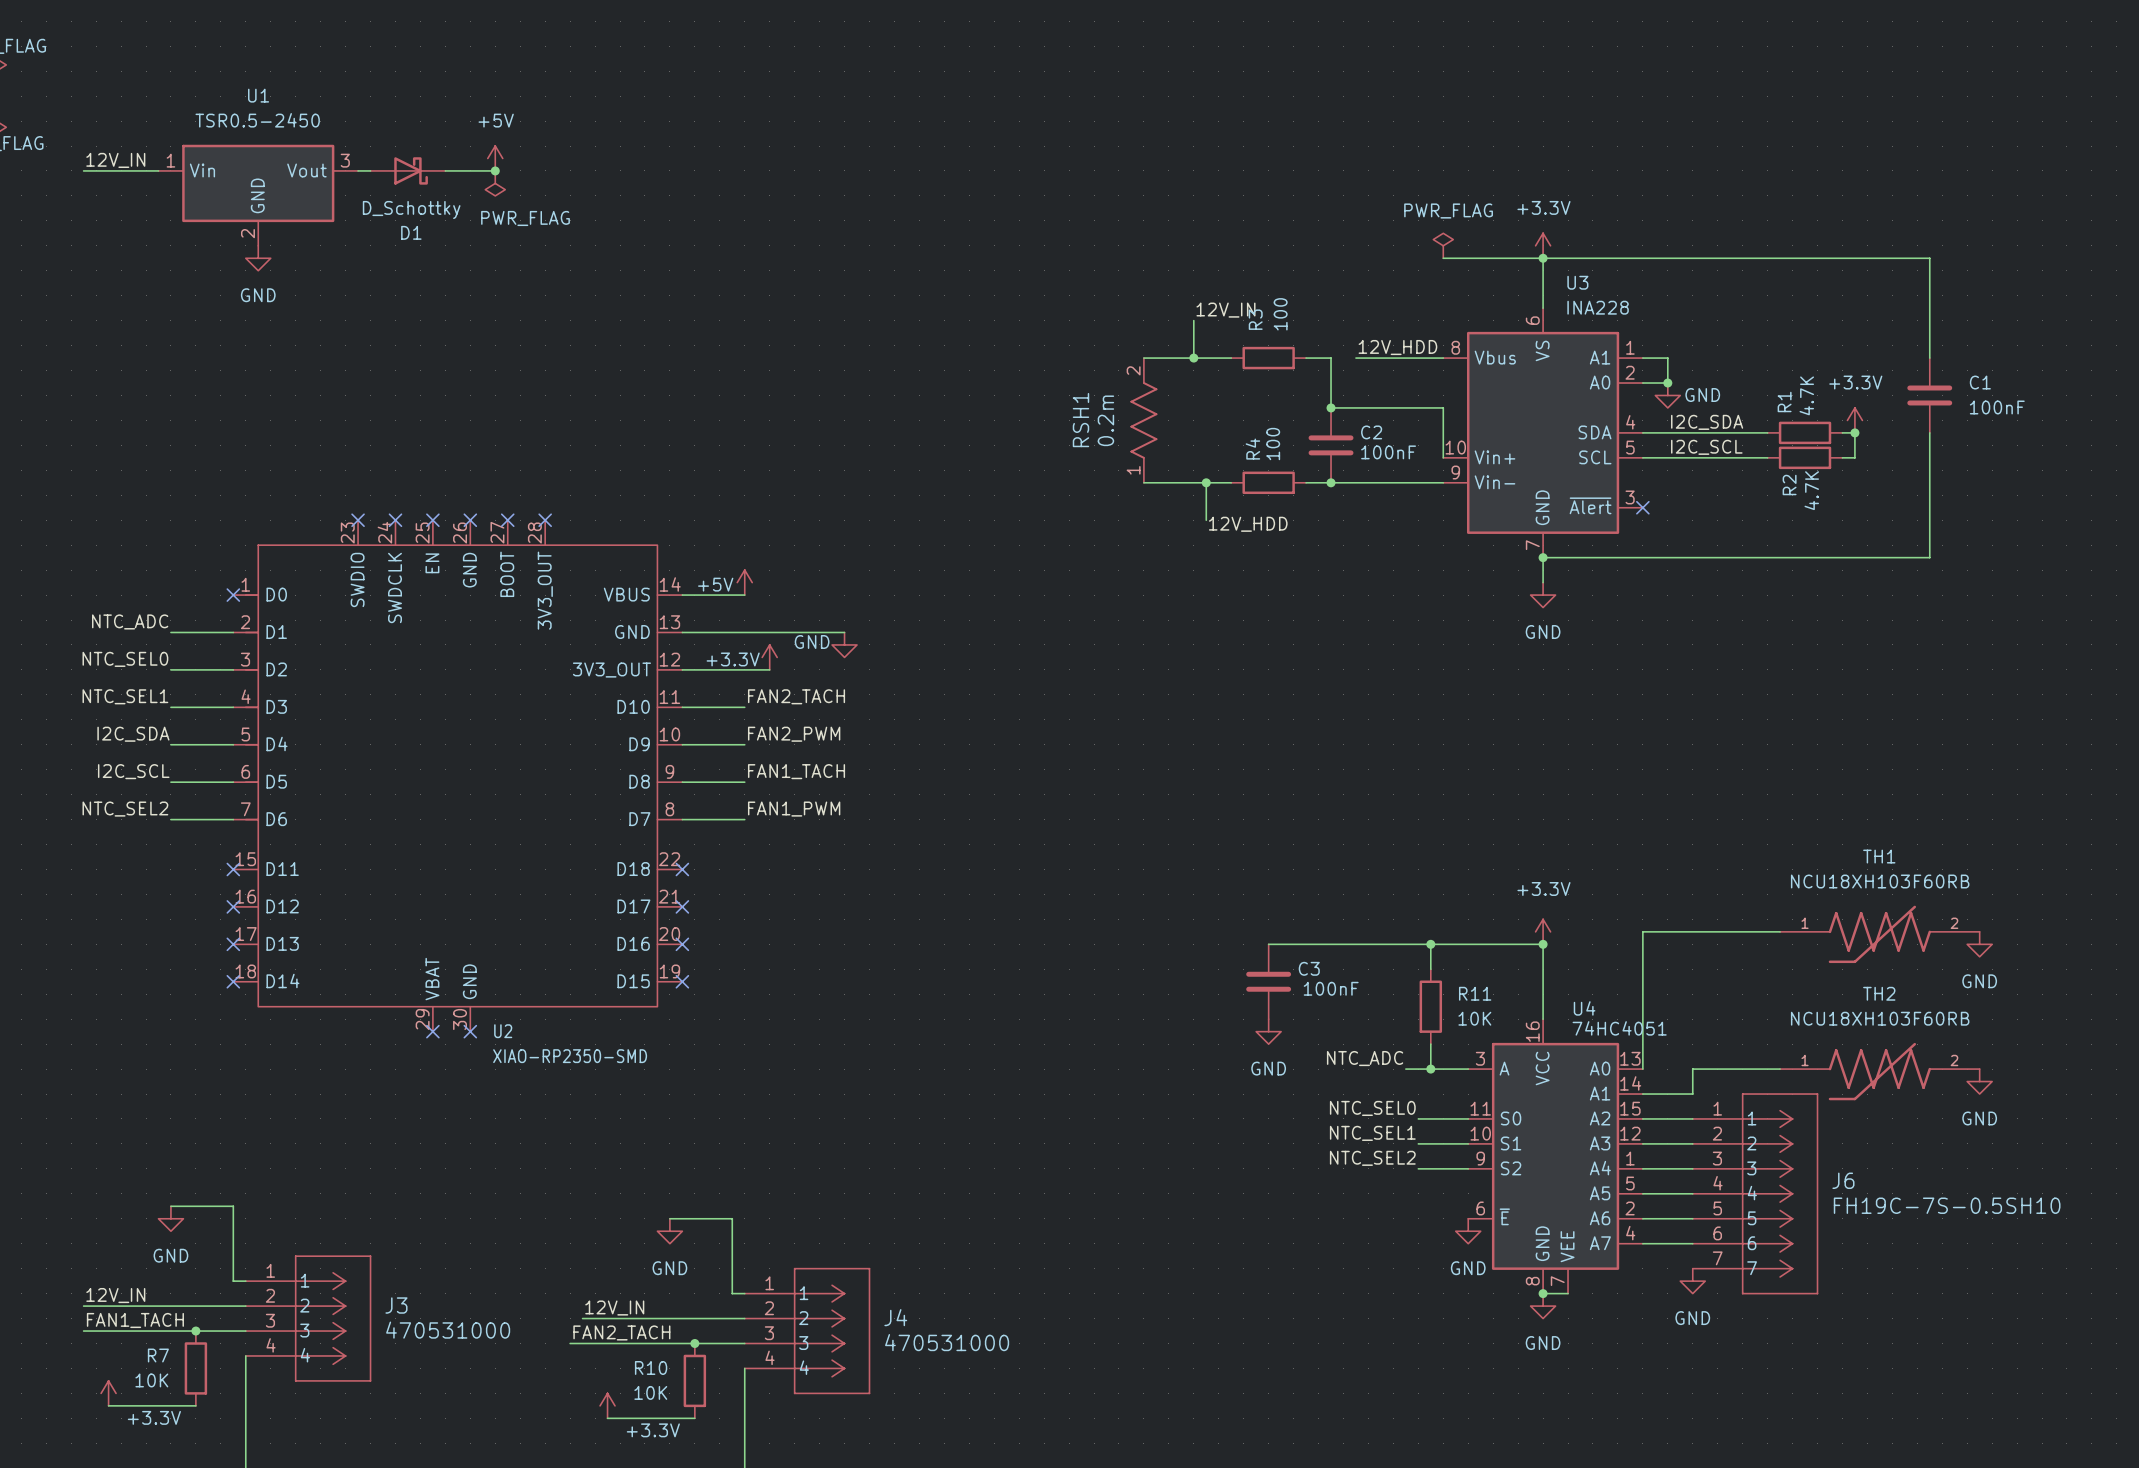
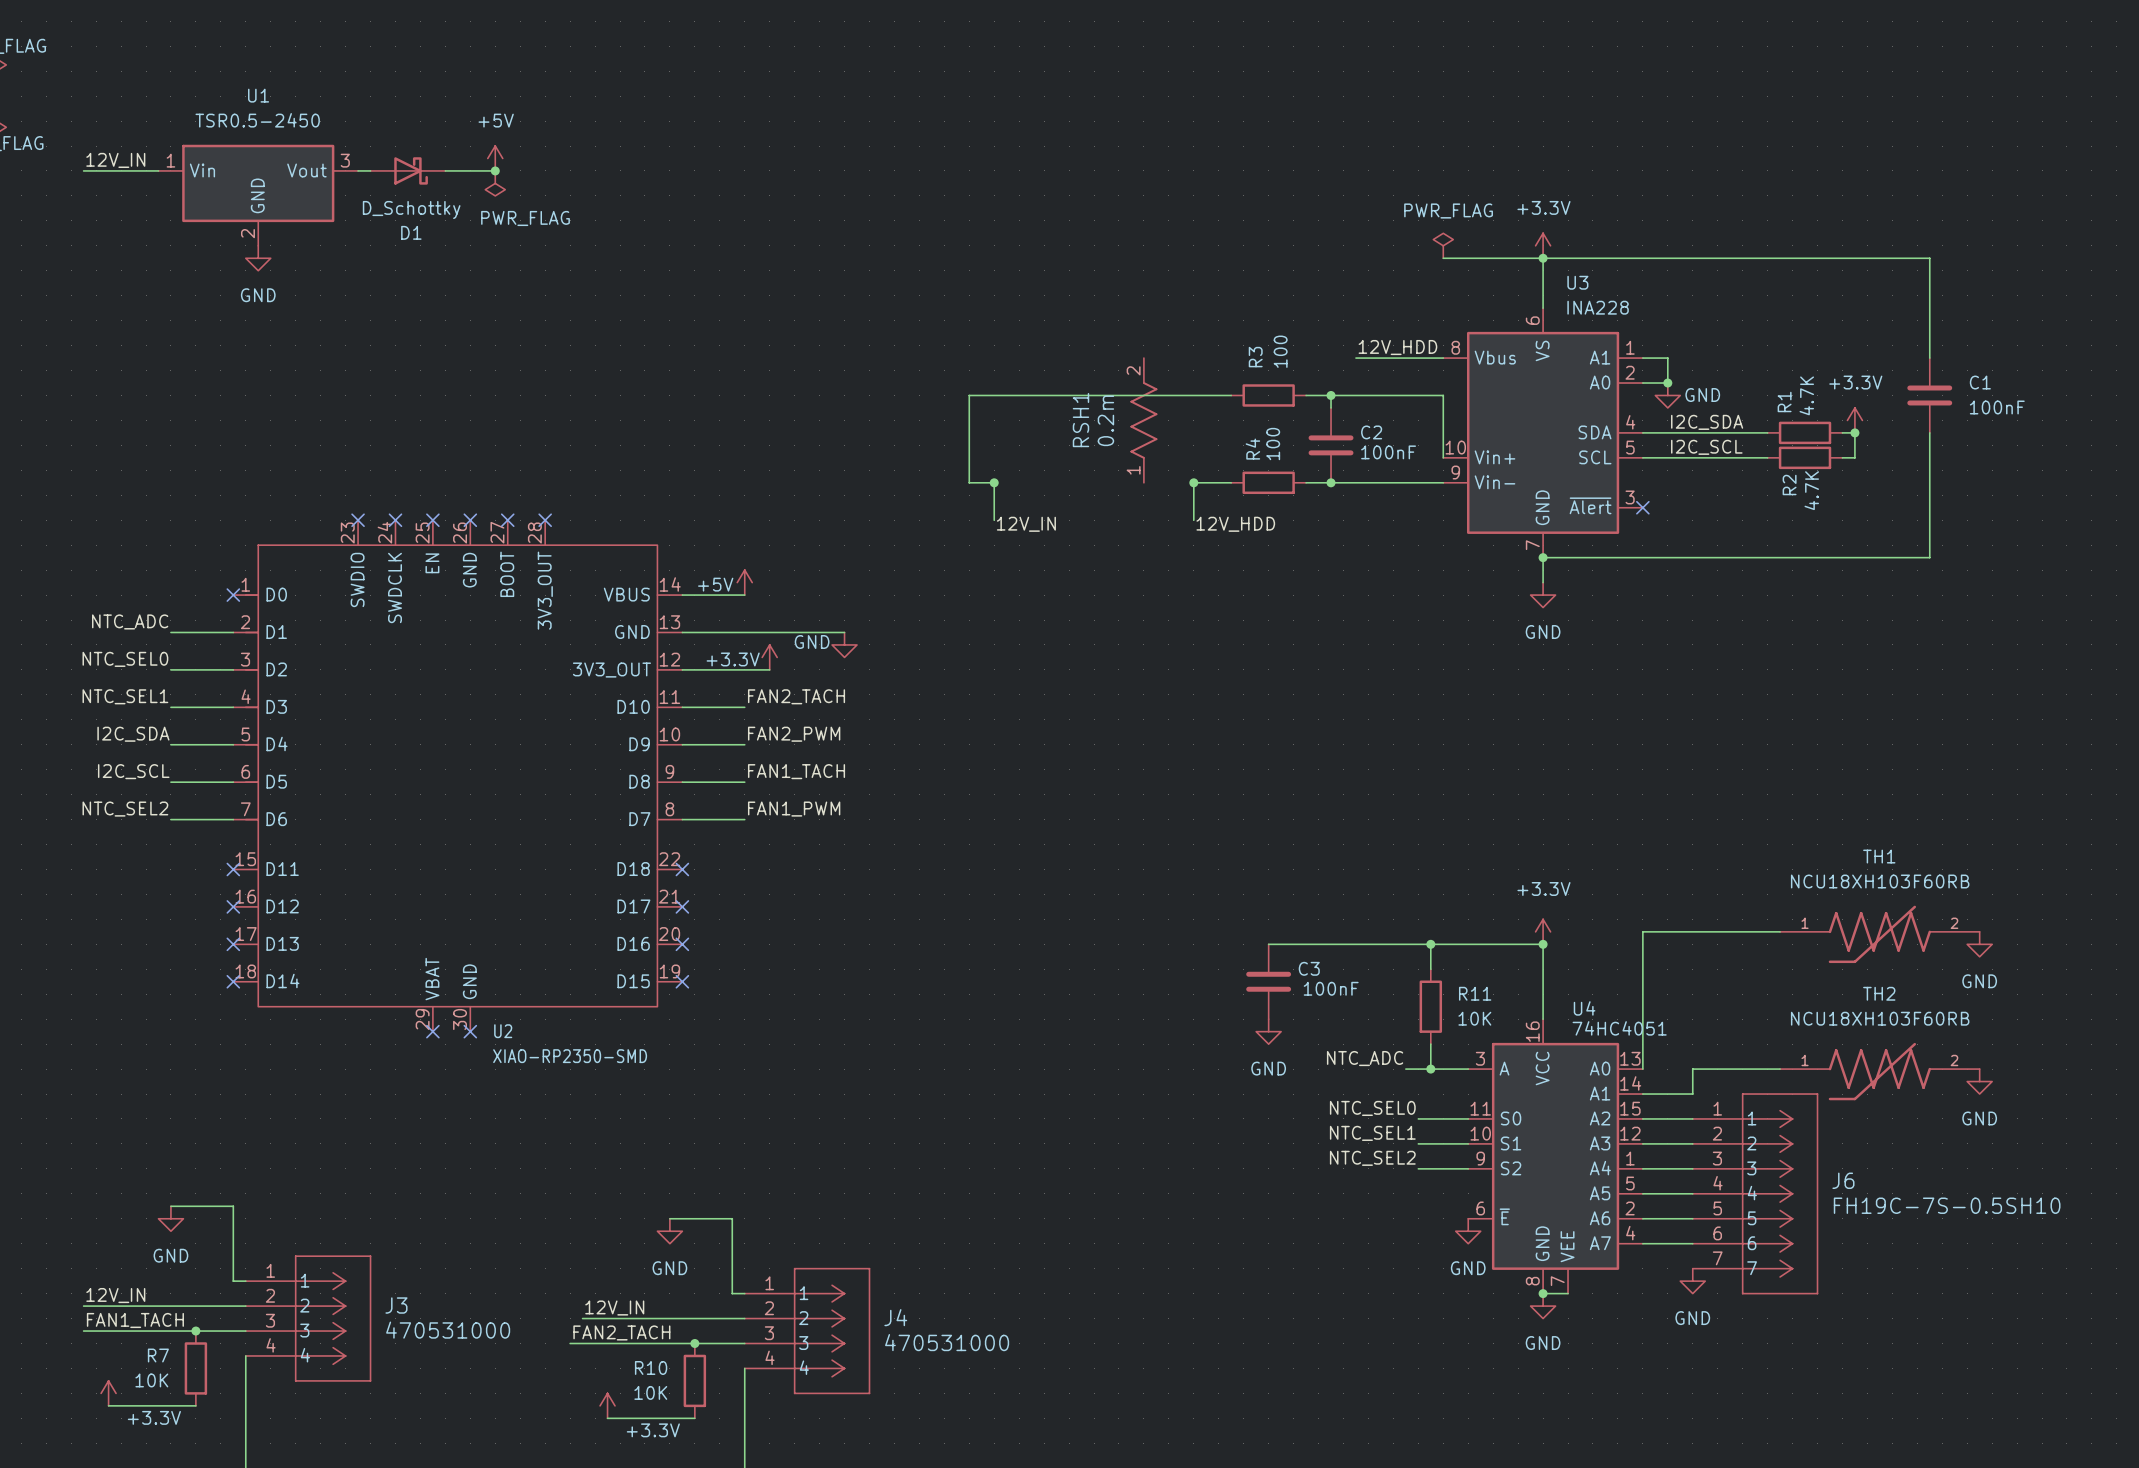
label: 12V_IN (1225, 310) -> none
wire: (1193, 320) (1193, 358) -> none
wire: (1143, 358) (1231, 358) -> none
junction: (1193, 358) -> none
R3 position: (1268, 358) -> (1268, 395)
wire: (1306, 358) (1331, 358) (1331, 395) -> none
wire: none -> (1231, 395) (969, 395) (969, 482) (994, 482) (994, 520)
wire: (1331, 407) (1443, 407) -> (1306, 395) (1443, 395) (1443, 407)
junction position: (1331, 407) -> (1331, 395)
junction: none -> (994, 482)
wire: (1143, 482) (1193, 482) -> (1193, 520) (1193, 482)
wire: (1206, 482) (1206, 520) -> none
junction position: (1206, 482) -> (1193, 482)
label: none -> 12V_IN (1026, 524)
label position: 12V_HDD (1248, 524) -> 12V_HDD (1235, 524)

